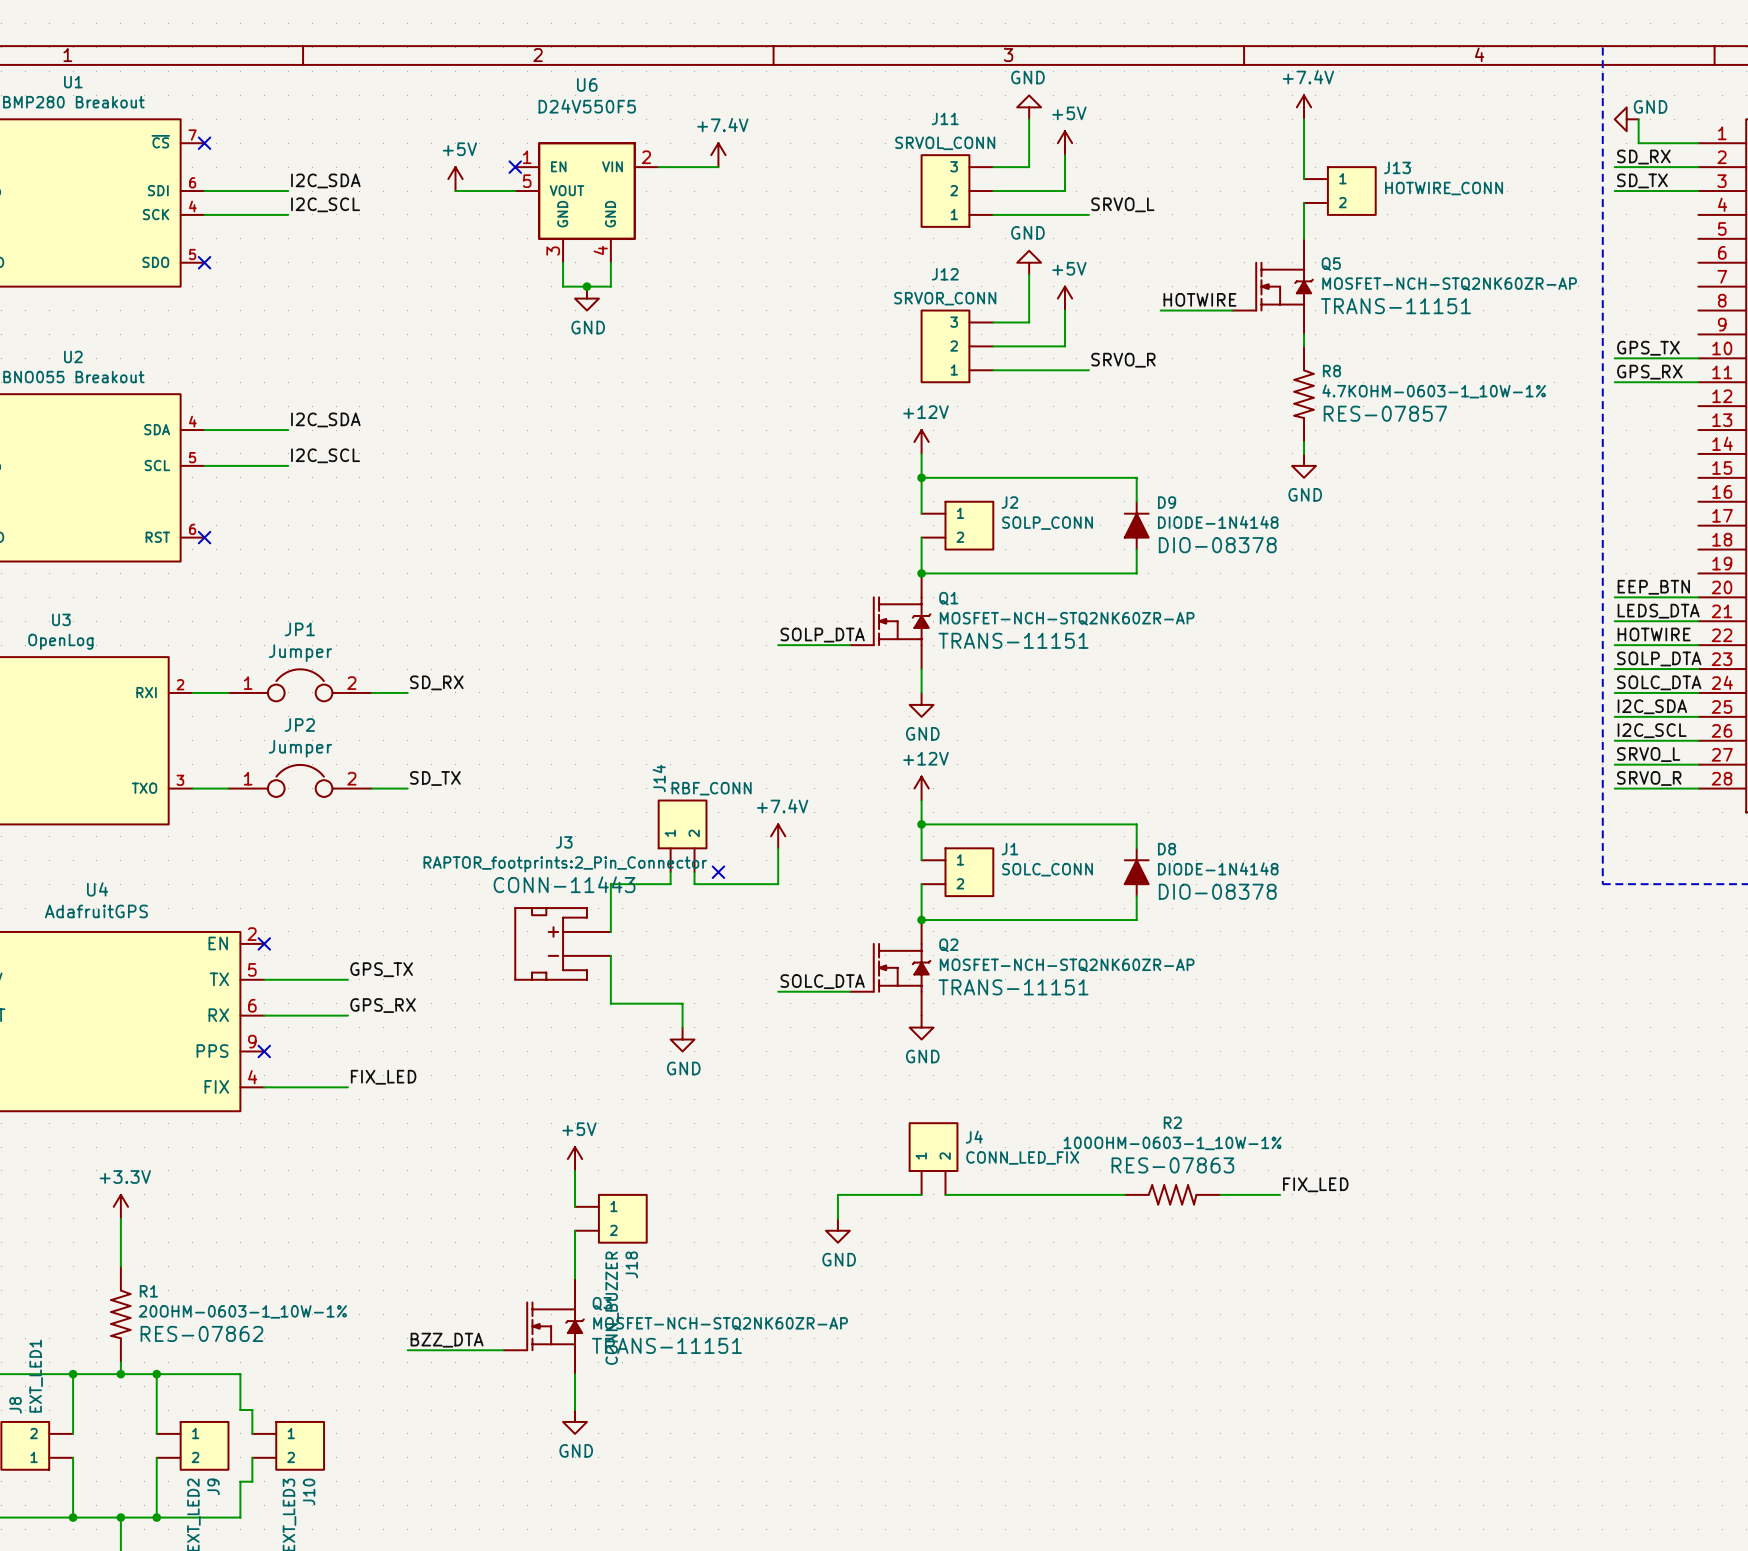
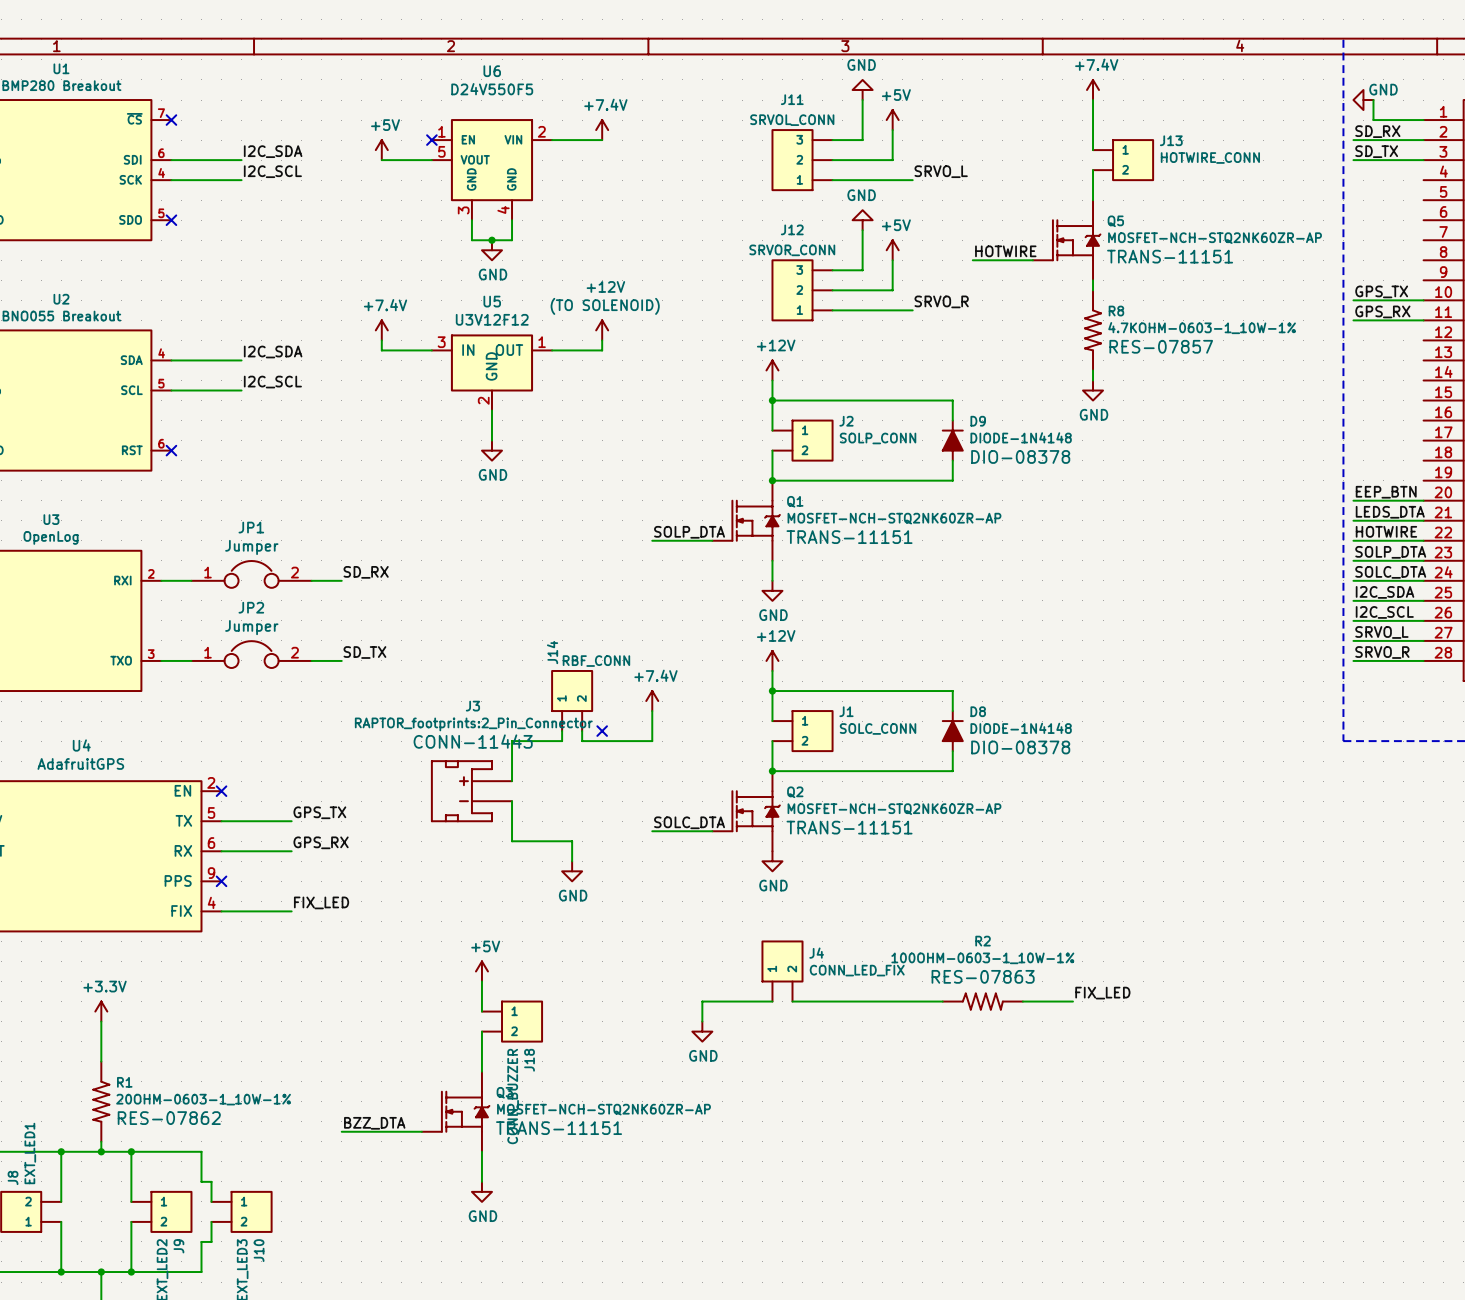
power symbol: none -> (381, 330)
power symbol: none -> +12V (602, 330)
wire: none -> (381, 340) (381, 350) (431, 350)
wire: none -> (602, 340) (602, 350) (552, 350)
U5: none -> U3V12F12 (491, 372)
wire: none -> (491, 410) (491, 440)
power symbol: none -> GND (491, 450)

